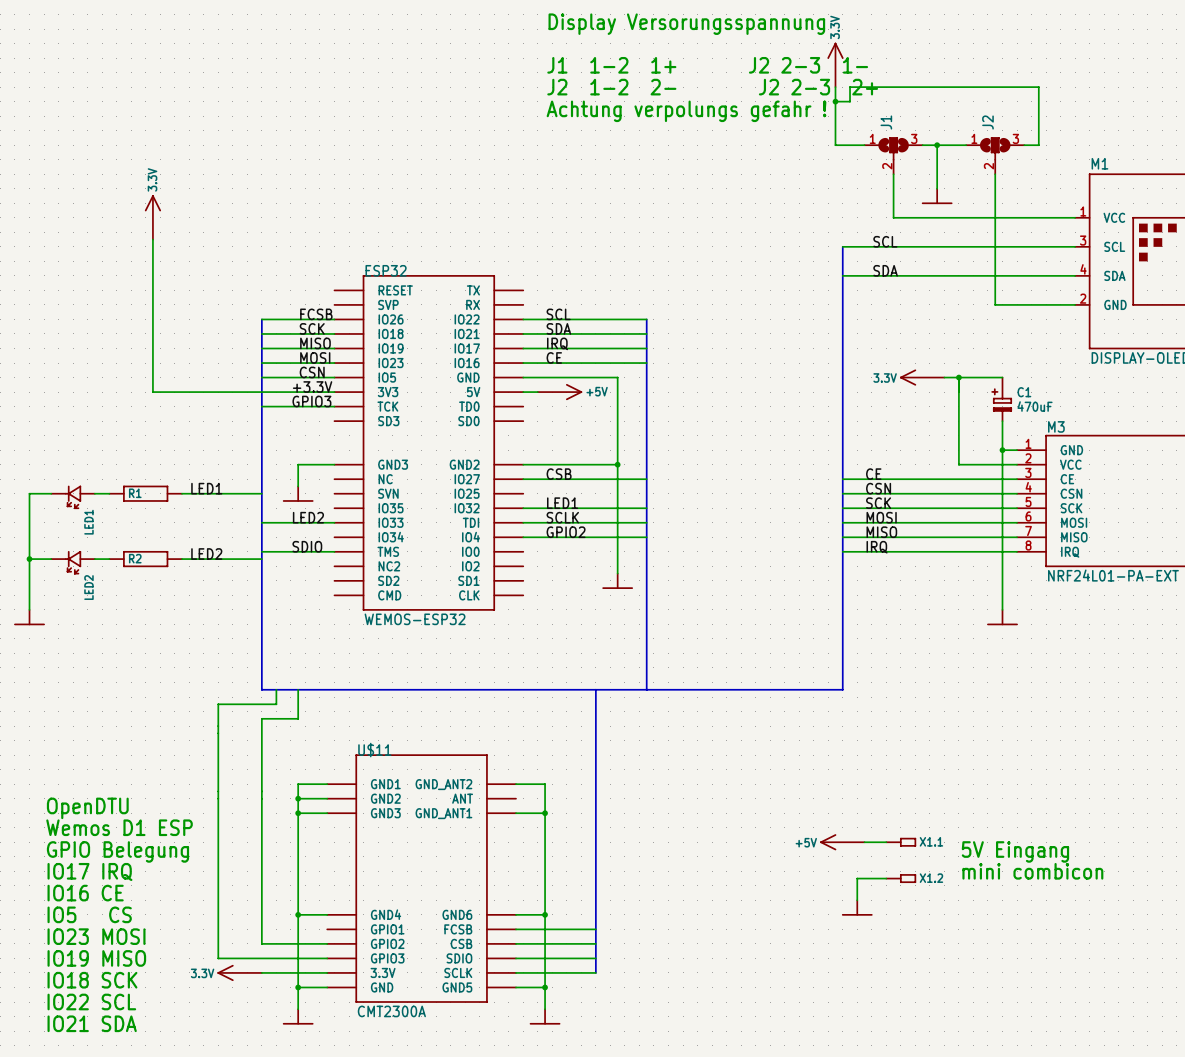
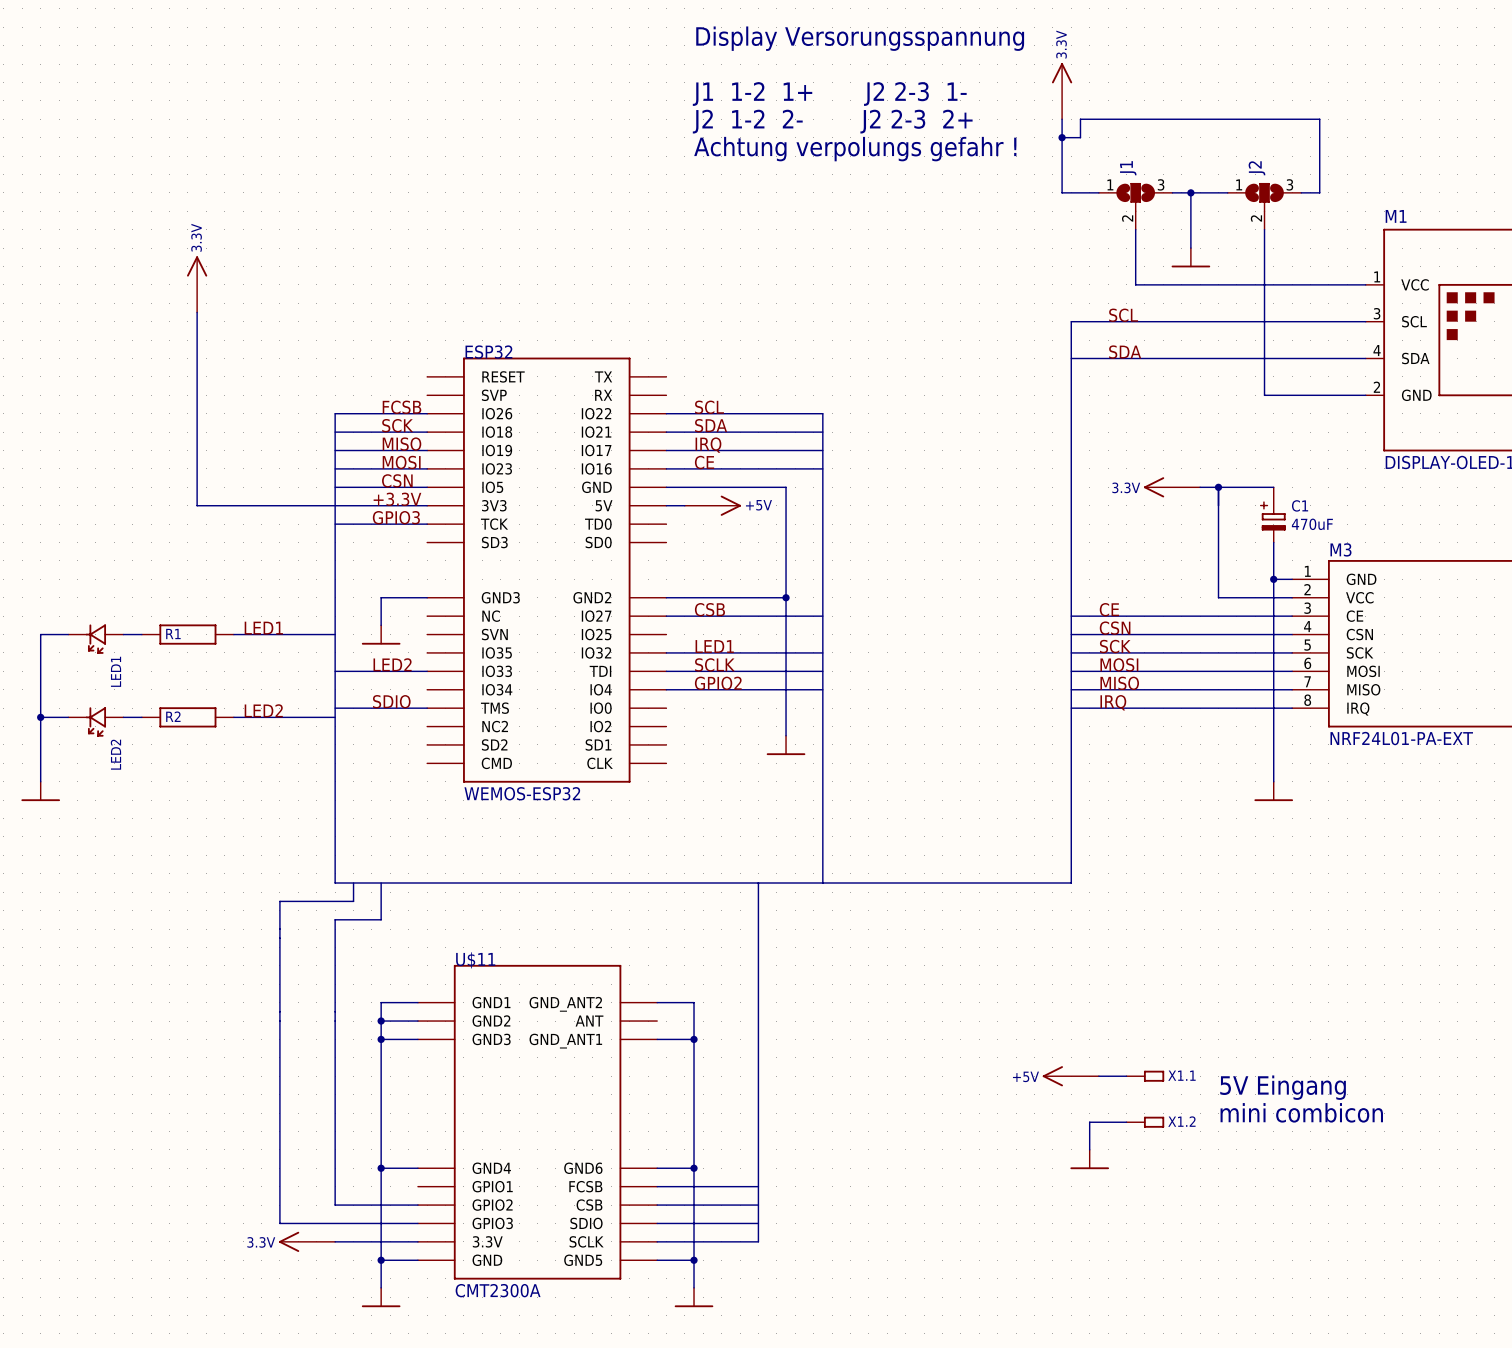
text: OpenDTU (87, 808) -> none
text: Wemos D1 ESP (119, 827) -> none
text: GPIO Belegung (117, 851) -> none
text: IO17 IRQ (89, 871) -> none
text: IO16 CE (85, 893) -> none
text: IO5 CS (89, 914) -> none
text: IO23 MOSI (96, 936) -> none
text: IO19 MISO (96, 958) -> none
text: IO18 SCK (92, 980) -> none
text: IO22 SCL (91, 1002) -> none
text: IO21 SDA (92, 1023) -> none

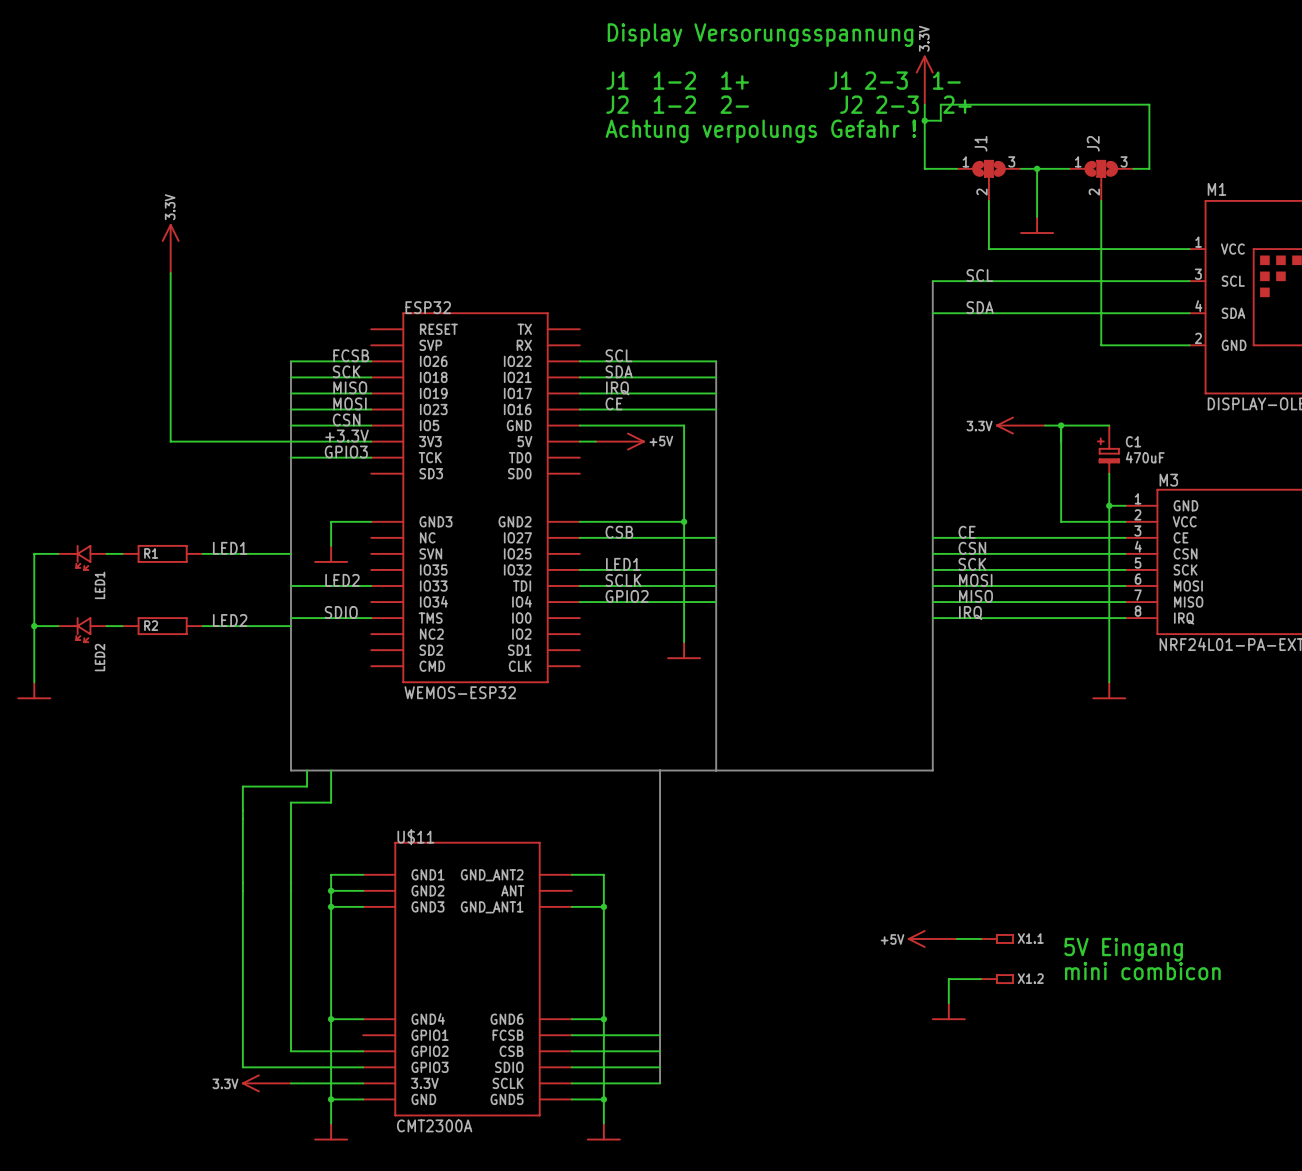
text: J1 1-2 1+ J2 2-3 1- (829, 94) -> J1 1-2 1+ J1 2-3 1- (783, 80)
text: Achtung verpolungs gefahr ! (855, 149) -> Achtung verpolungs Gefahr ! (760, 131)

